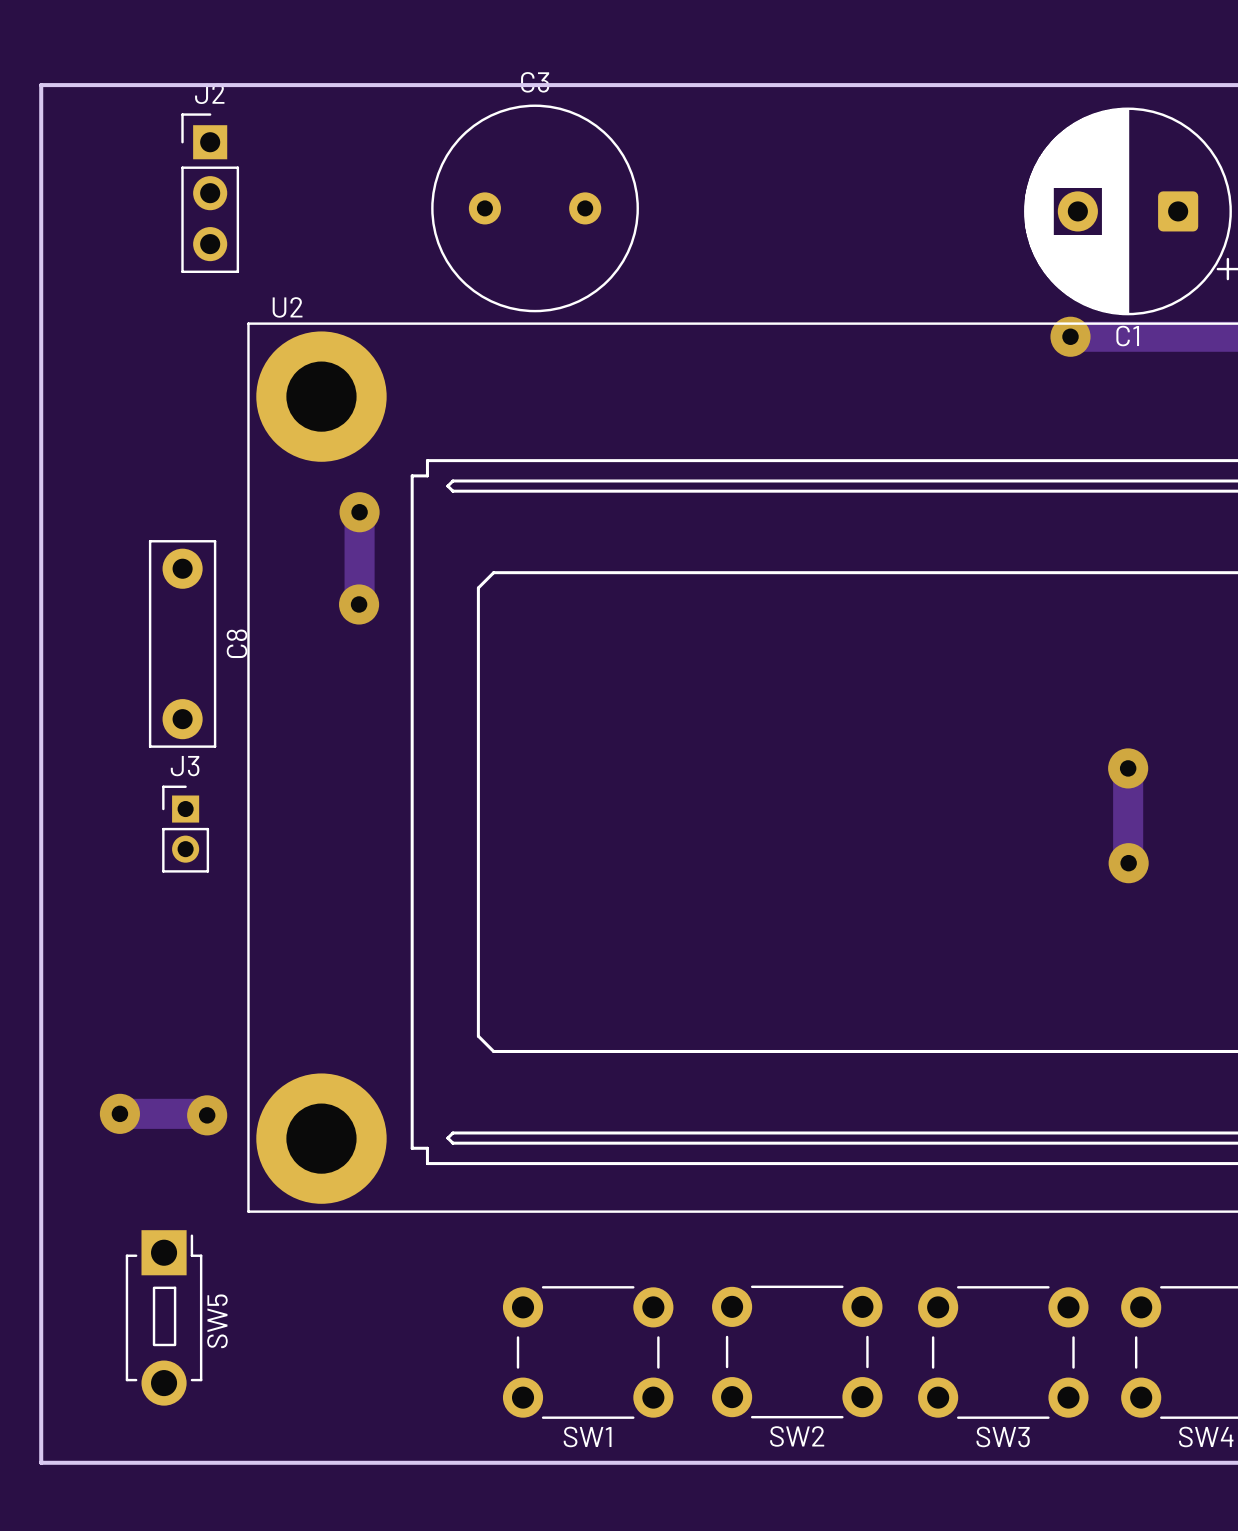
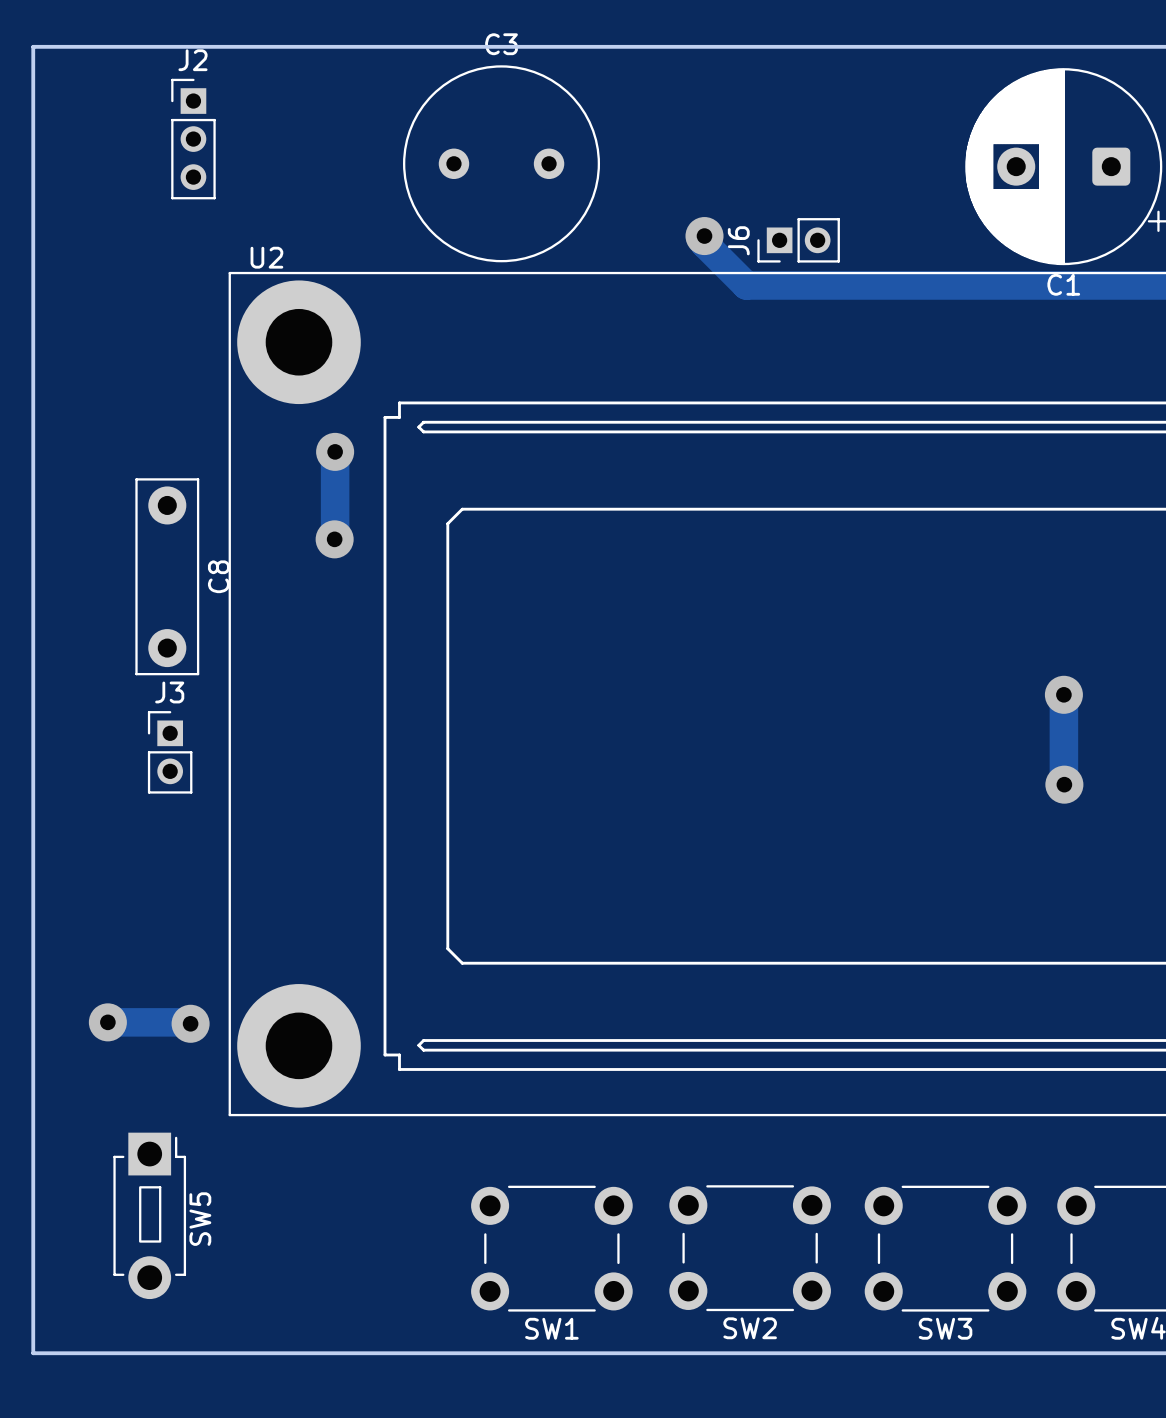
J2 footprint: [181, 113, 240, 273] -> [171, 78, 216, 200]
track: none -> (704, 236) (704, 243) (746, 285) (1009, 285)
via: none -> (704, 236)
J6: none -> (798, 240)
via: (1070, 336) -> none

